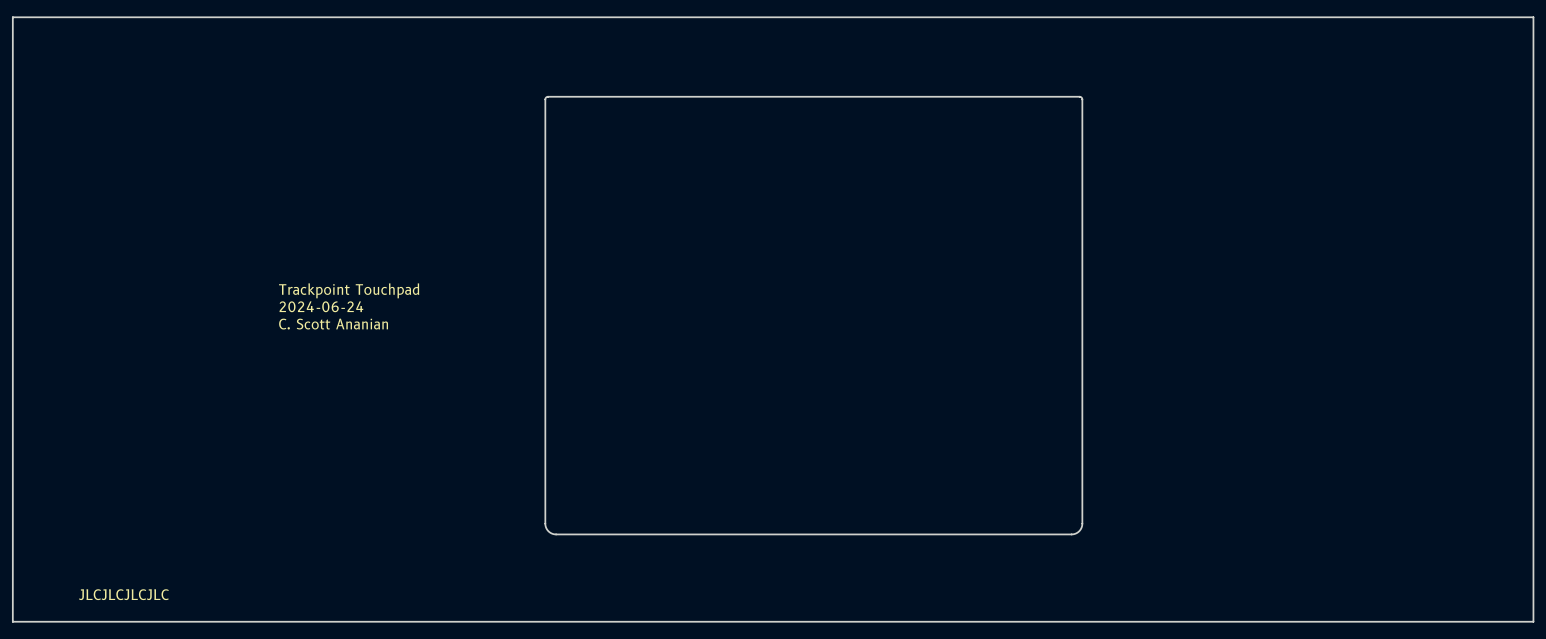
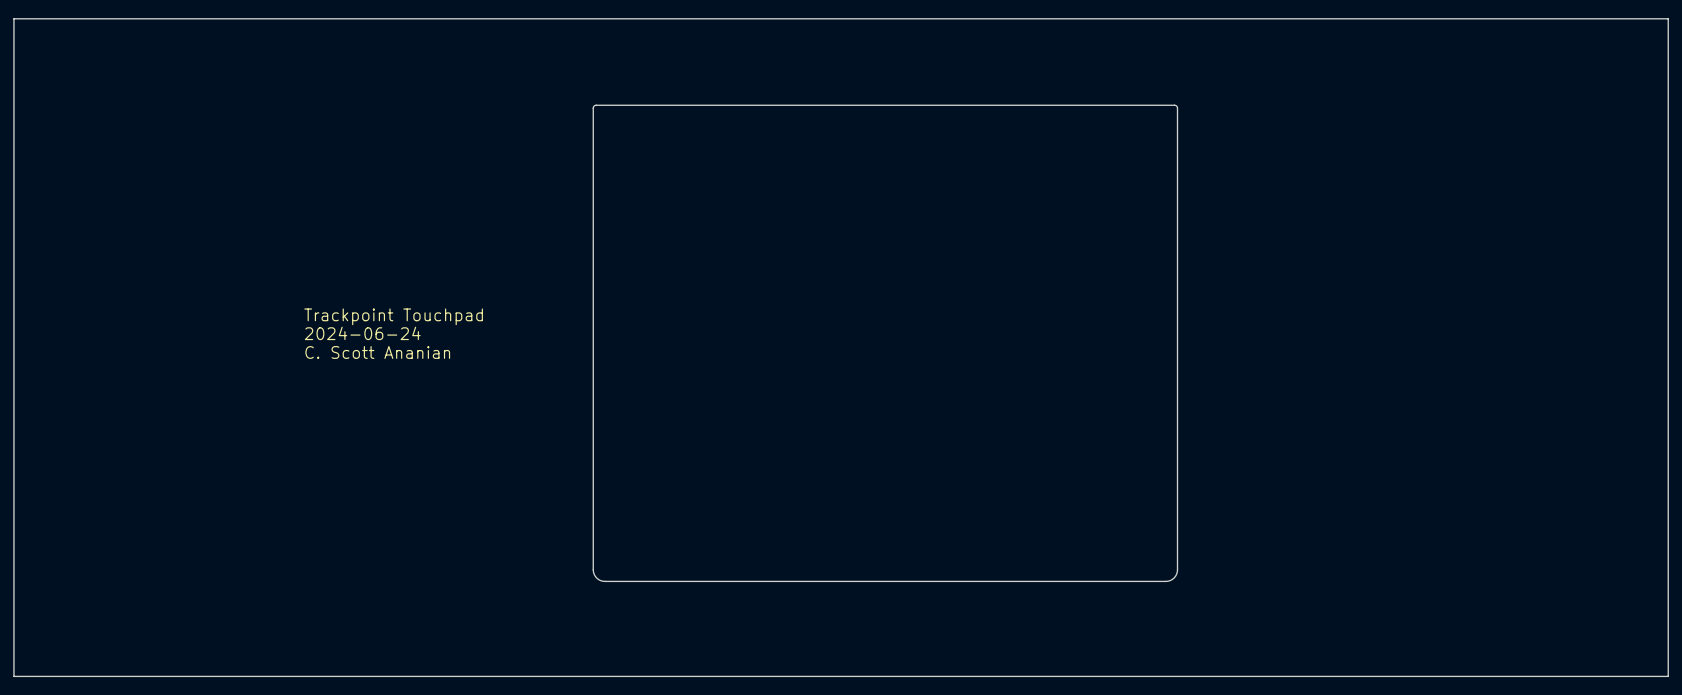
text: JLCJLCJLCJLC (123, 594) -> none

